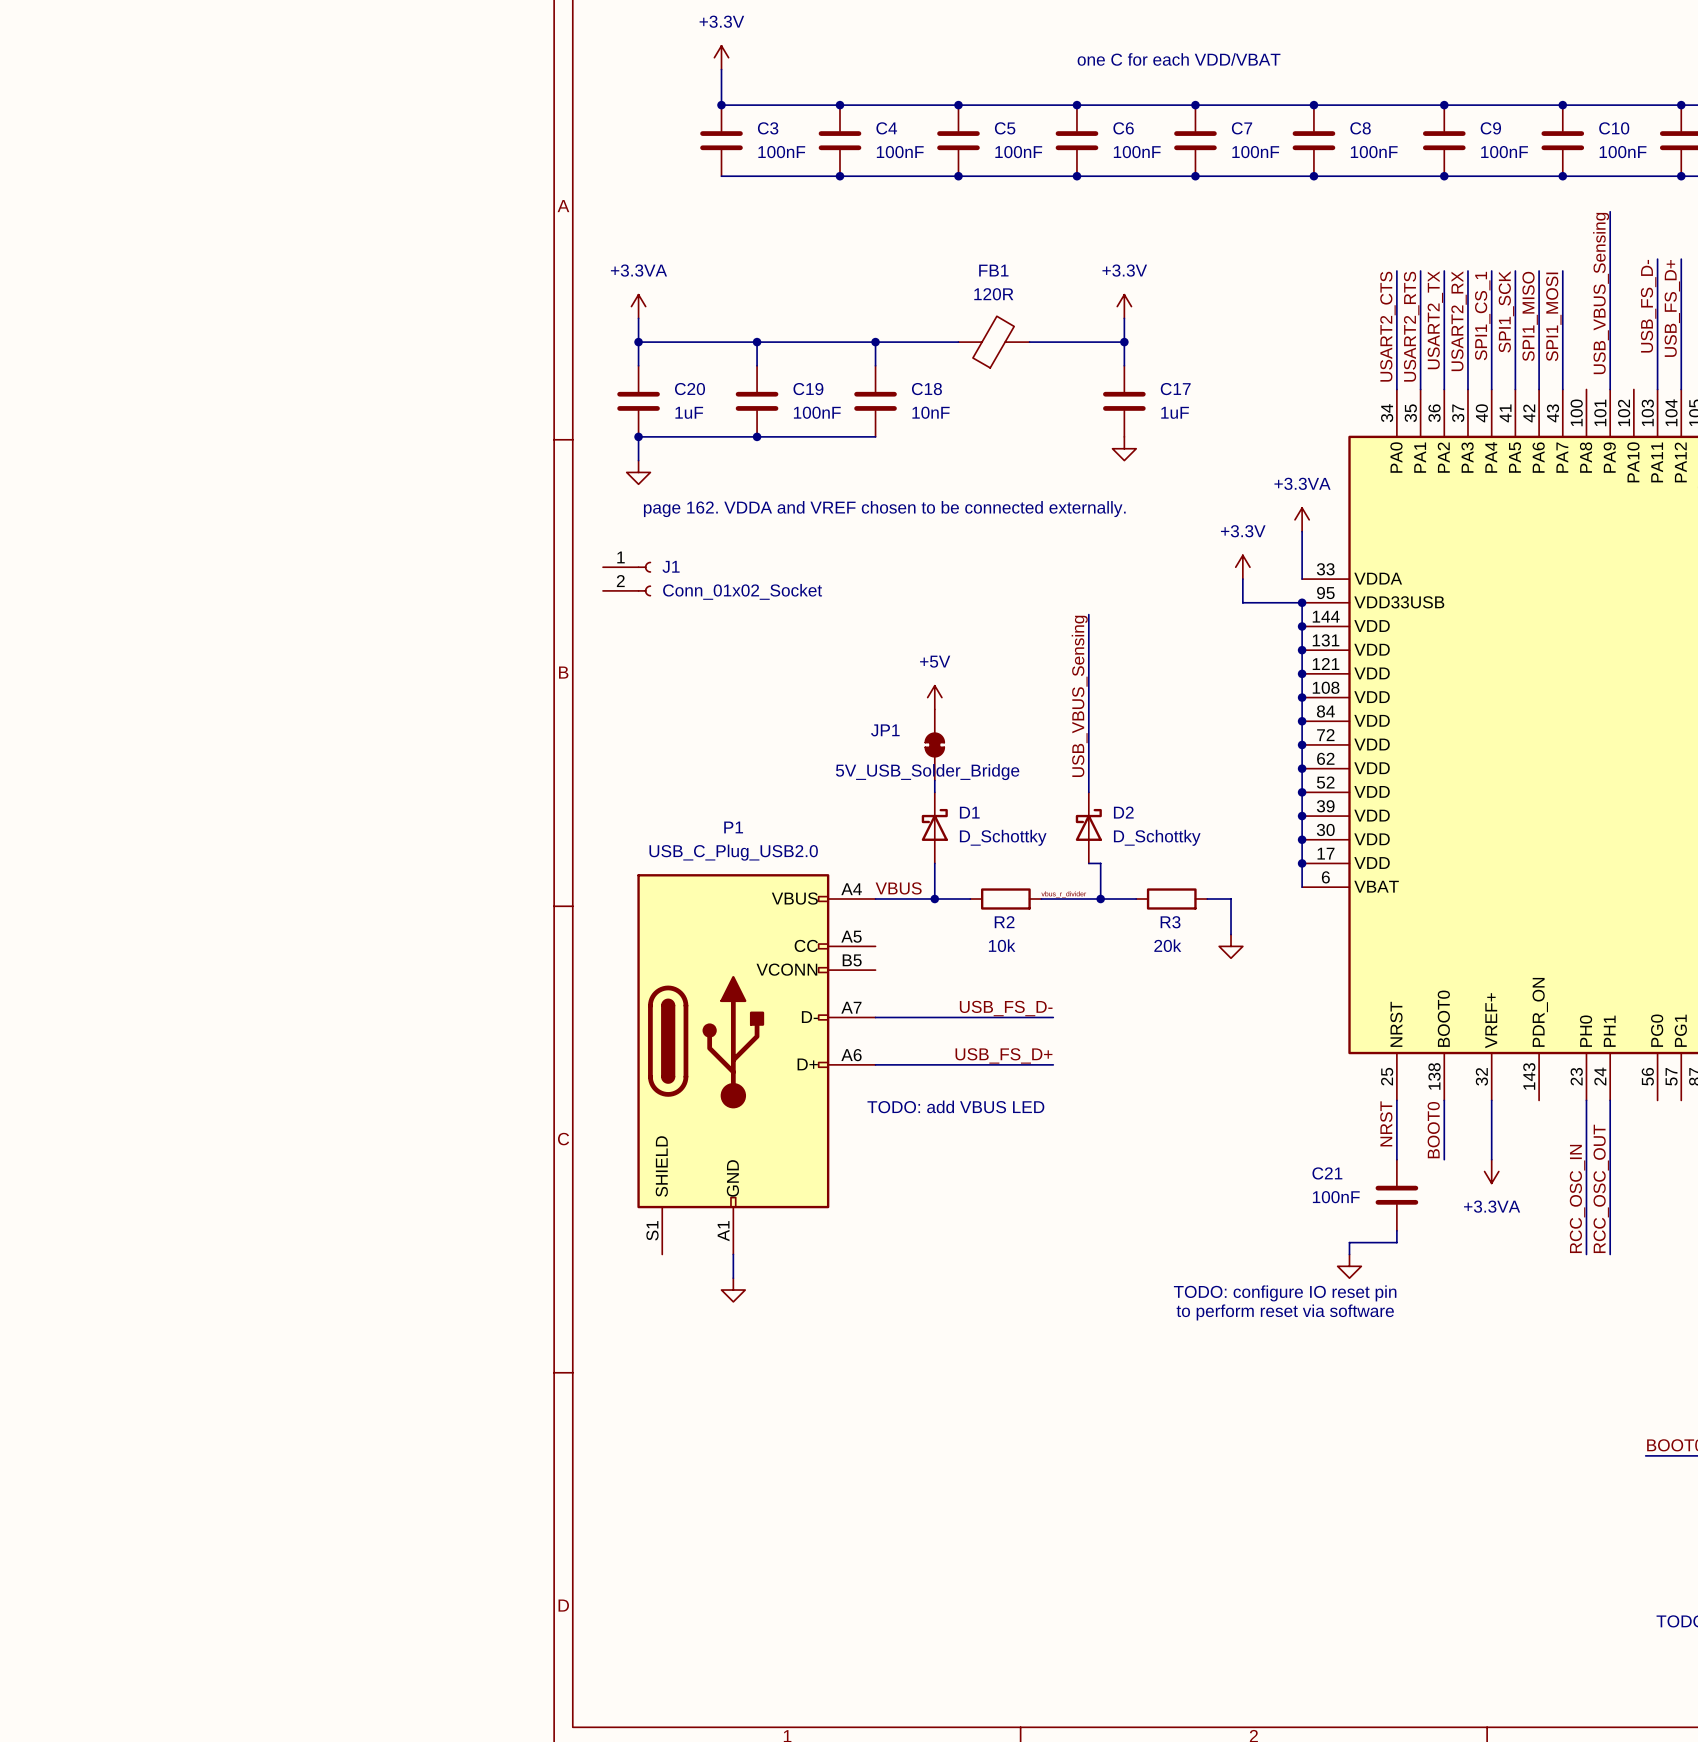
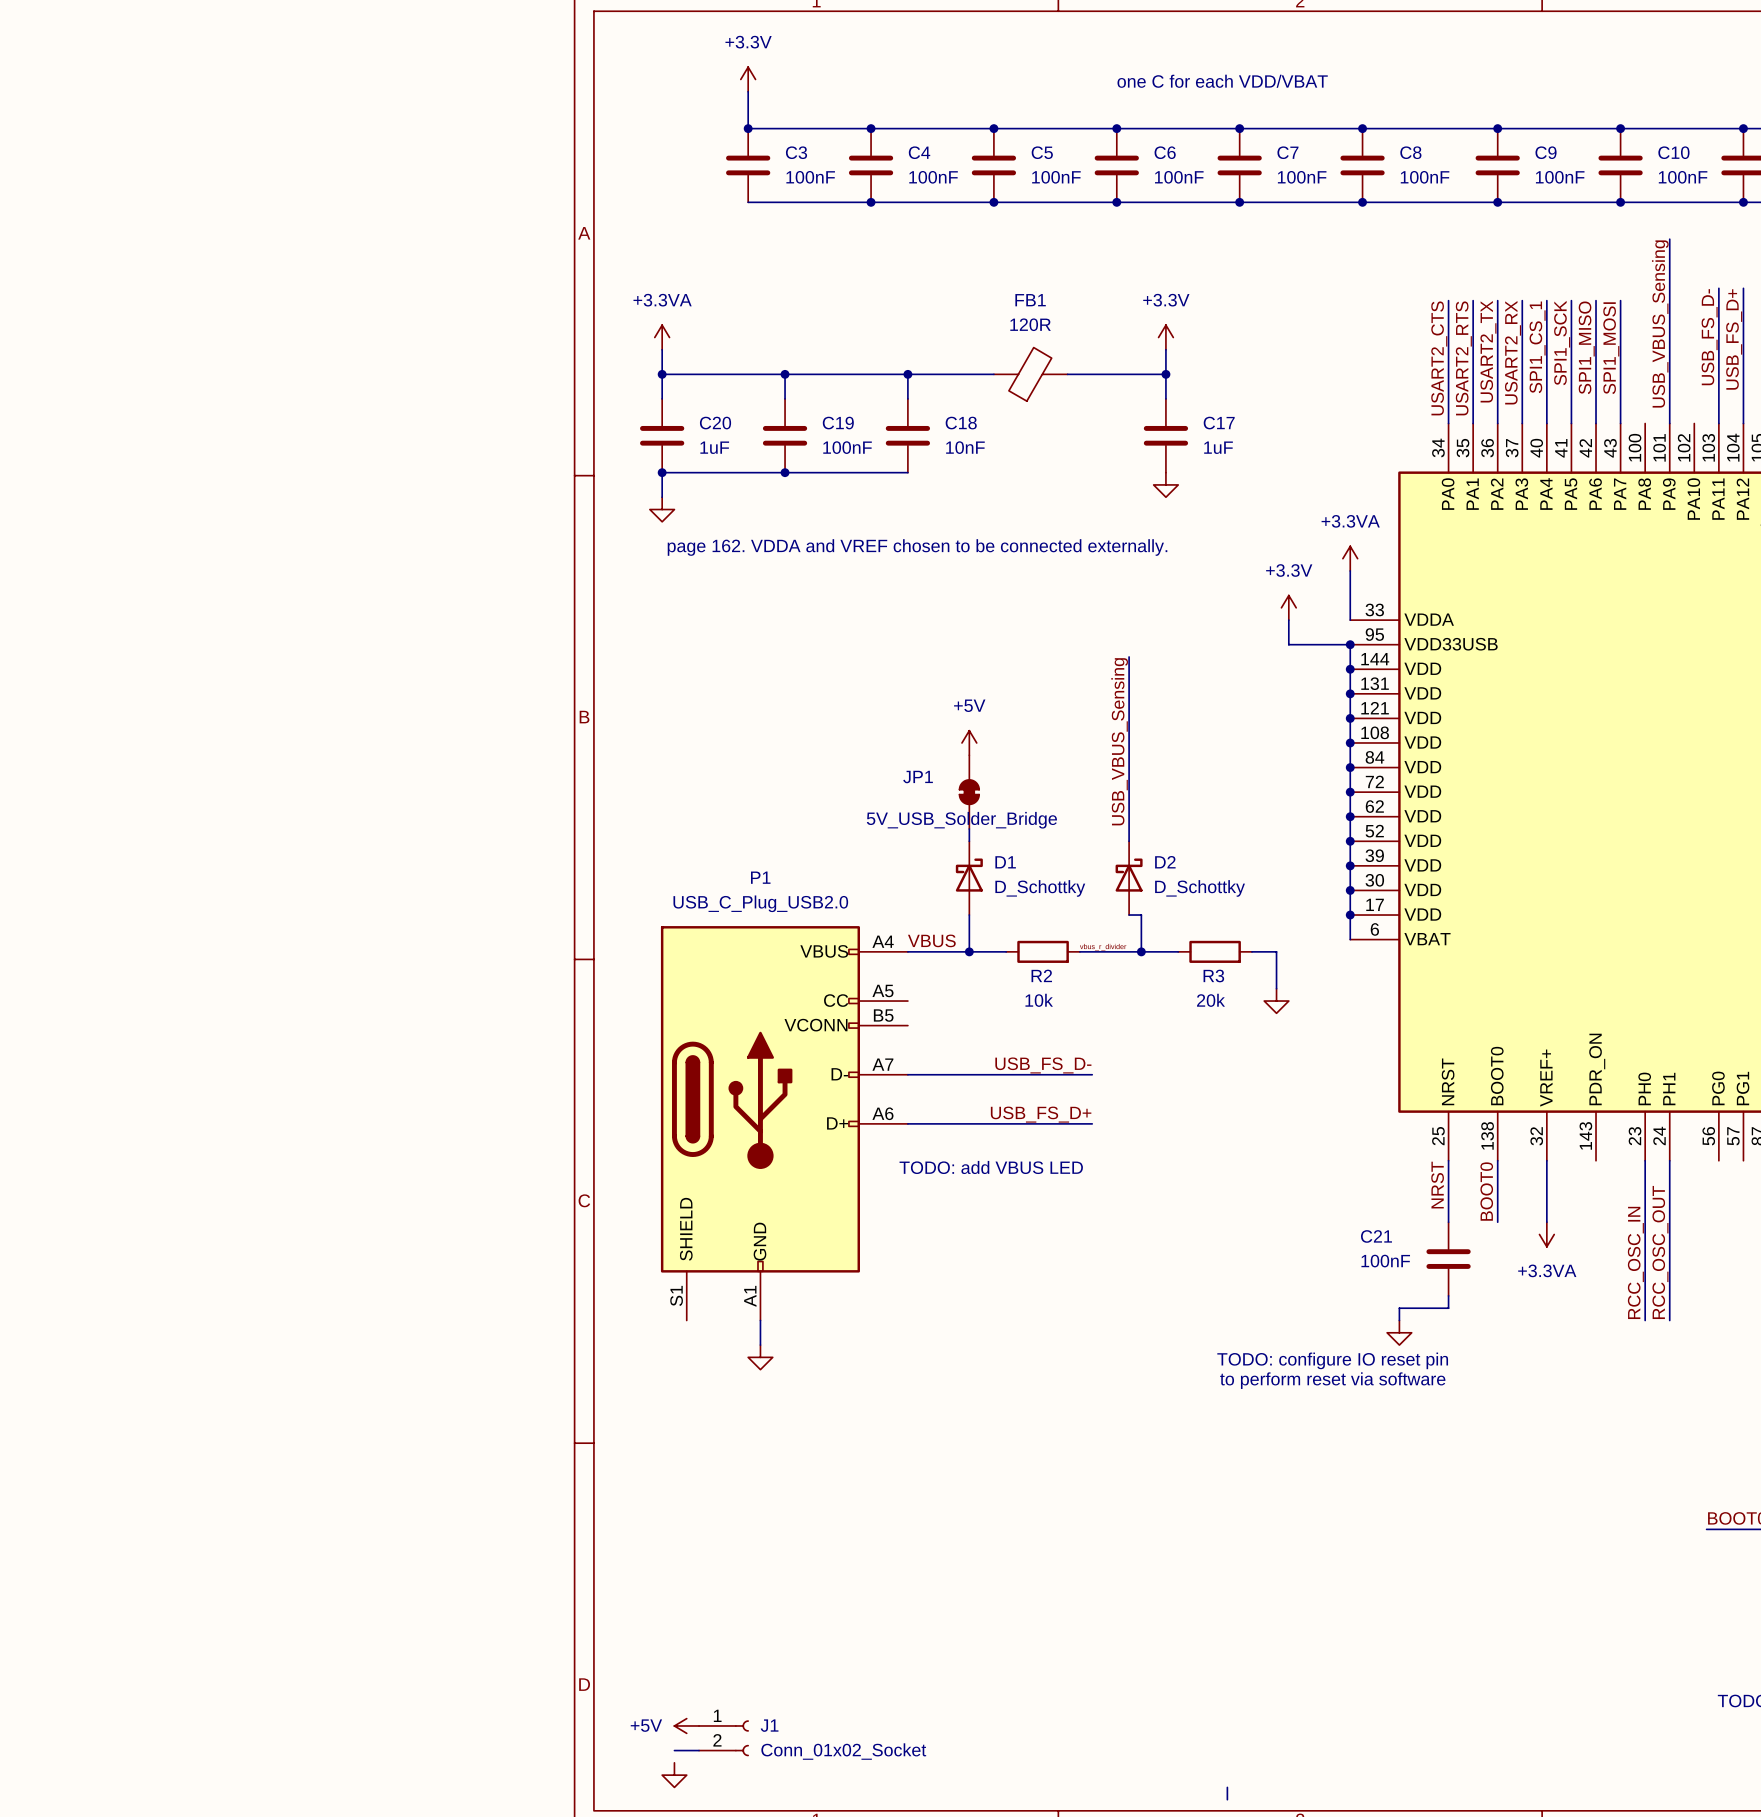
J1 position: (627, 579) -> (723, 1738)
power symbol: none -> +5V (686, 1725)
wire: none -> (674, 1750) (699, 1750)
power symbol: none -> (674, 1775)
wire: none -> (1227, 1787) (1227, 1799)

